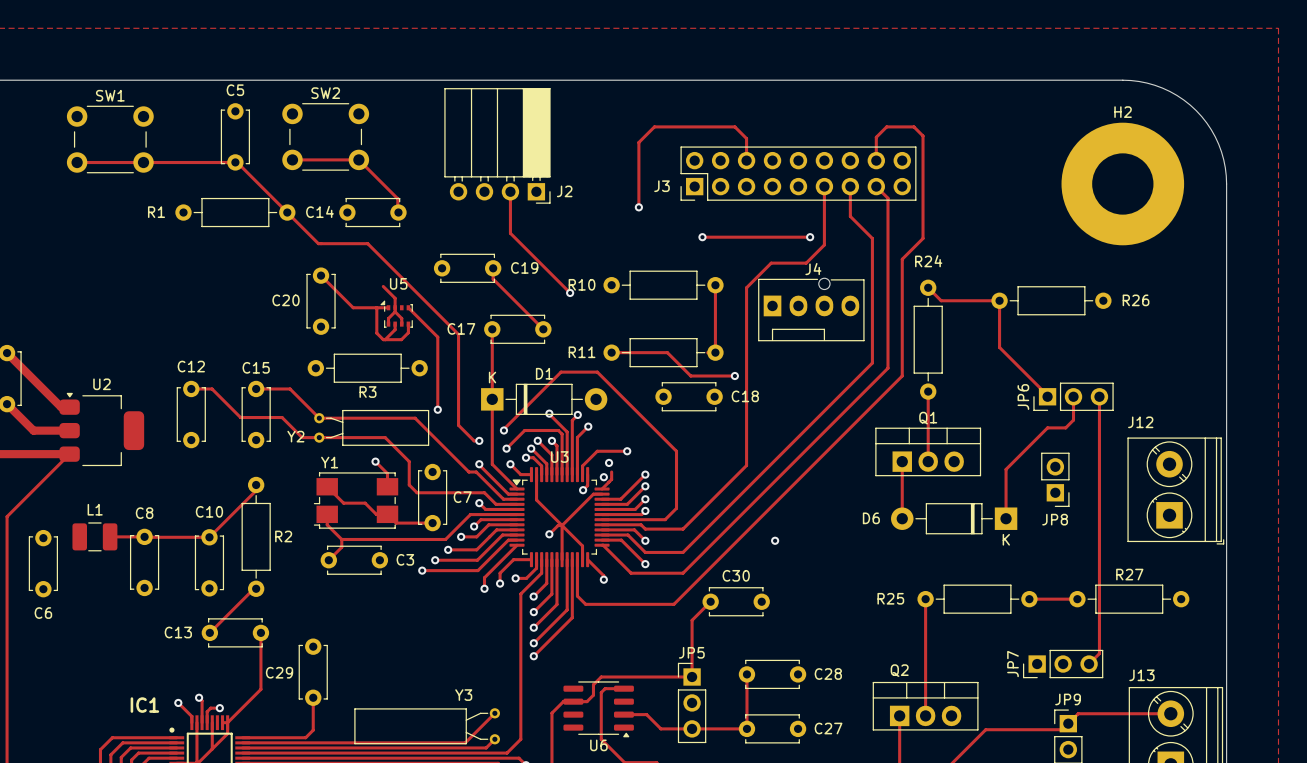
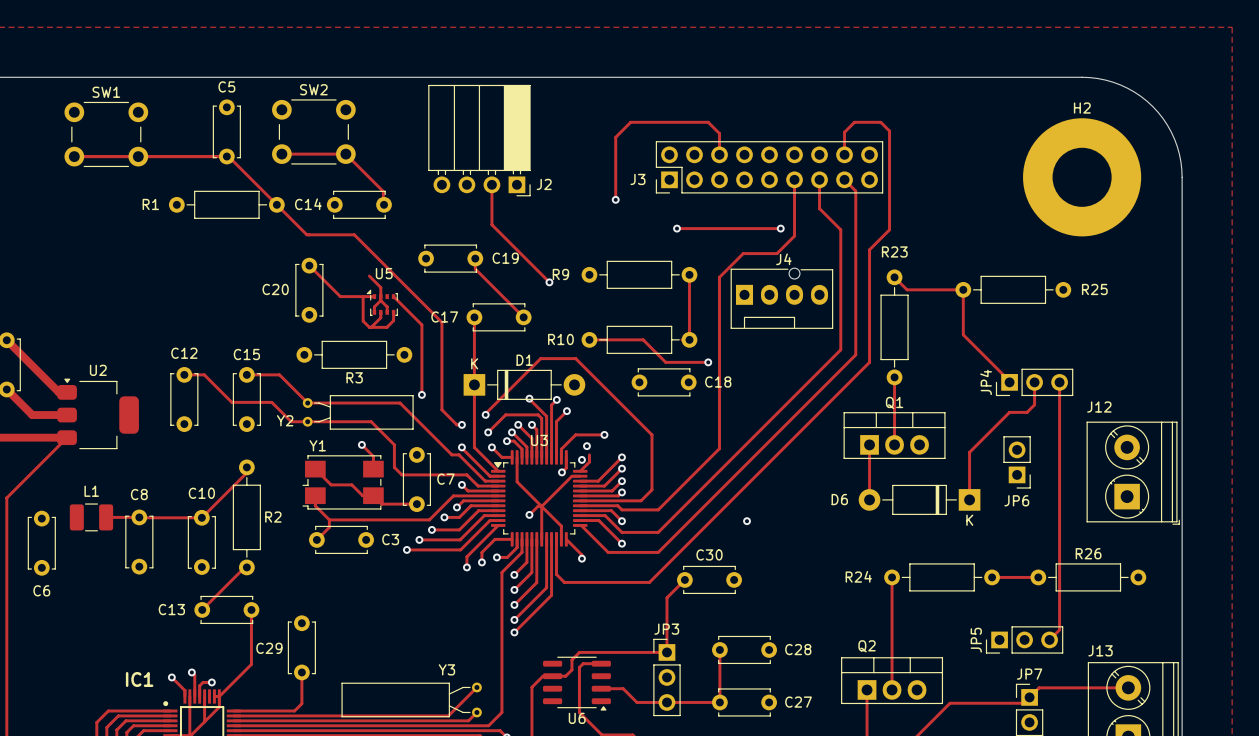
R24 name: R24 (928, 261) -> R23 (894, 251)
R10 name: R10 (582, 284) -> R9 (560, 274)
R26 name: R26 (1136, 300) -> R25 (1094, 289)
R11 name: R11 (582, 352) -> R10 (560, 339)
JP6 name: JP6 (1023, 397) -> JP4 (986, 382)
JP8 name: JP8 (1055, 519) -> JP6 (1016, 500)
R27 name: R27 (1129, 574) -> R26 (1088, 553)
R25 name: R25 (890, 598) -> R24 (858, 576)
JP5 name: JP5 (691, 652) -> JP3 (666, 629)
JP7 name: JP7 (1013, 664) -> JP5 (976, 640)
JP9 name: JP9 (1068, 699) -> JP7 (1029, 674)

